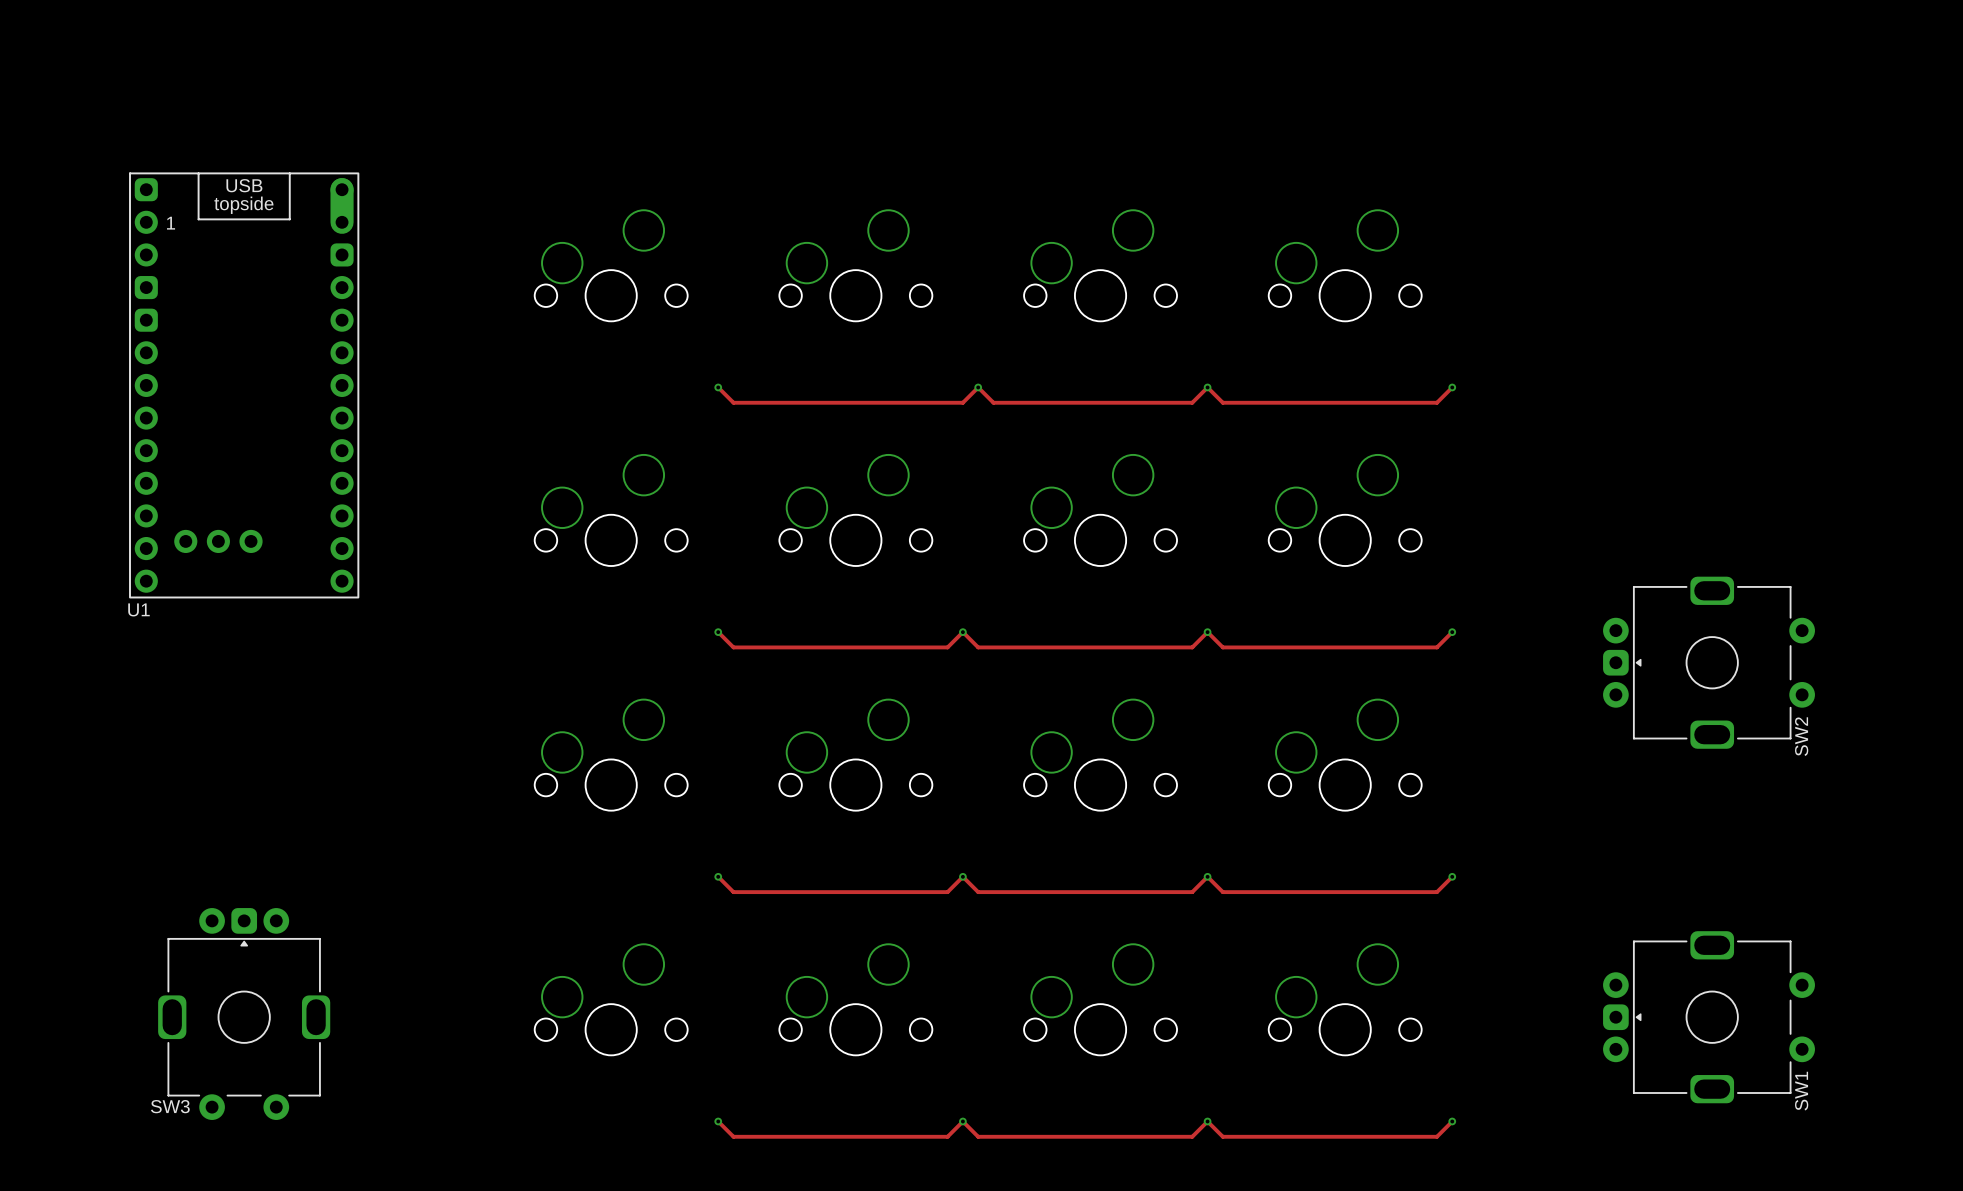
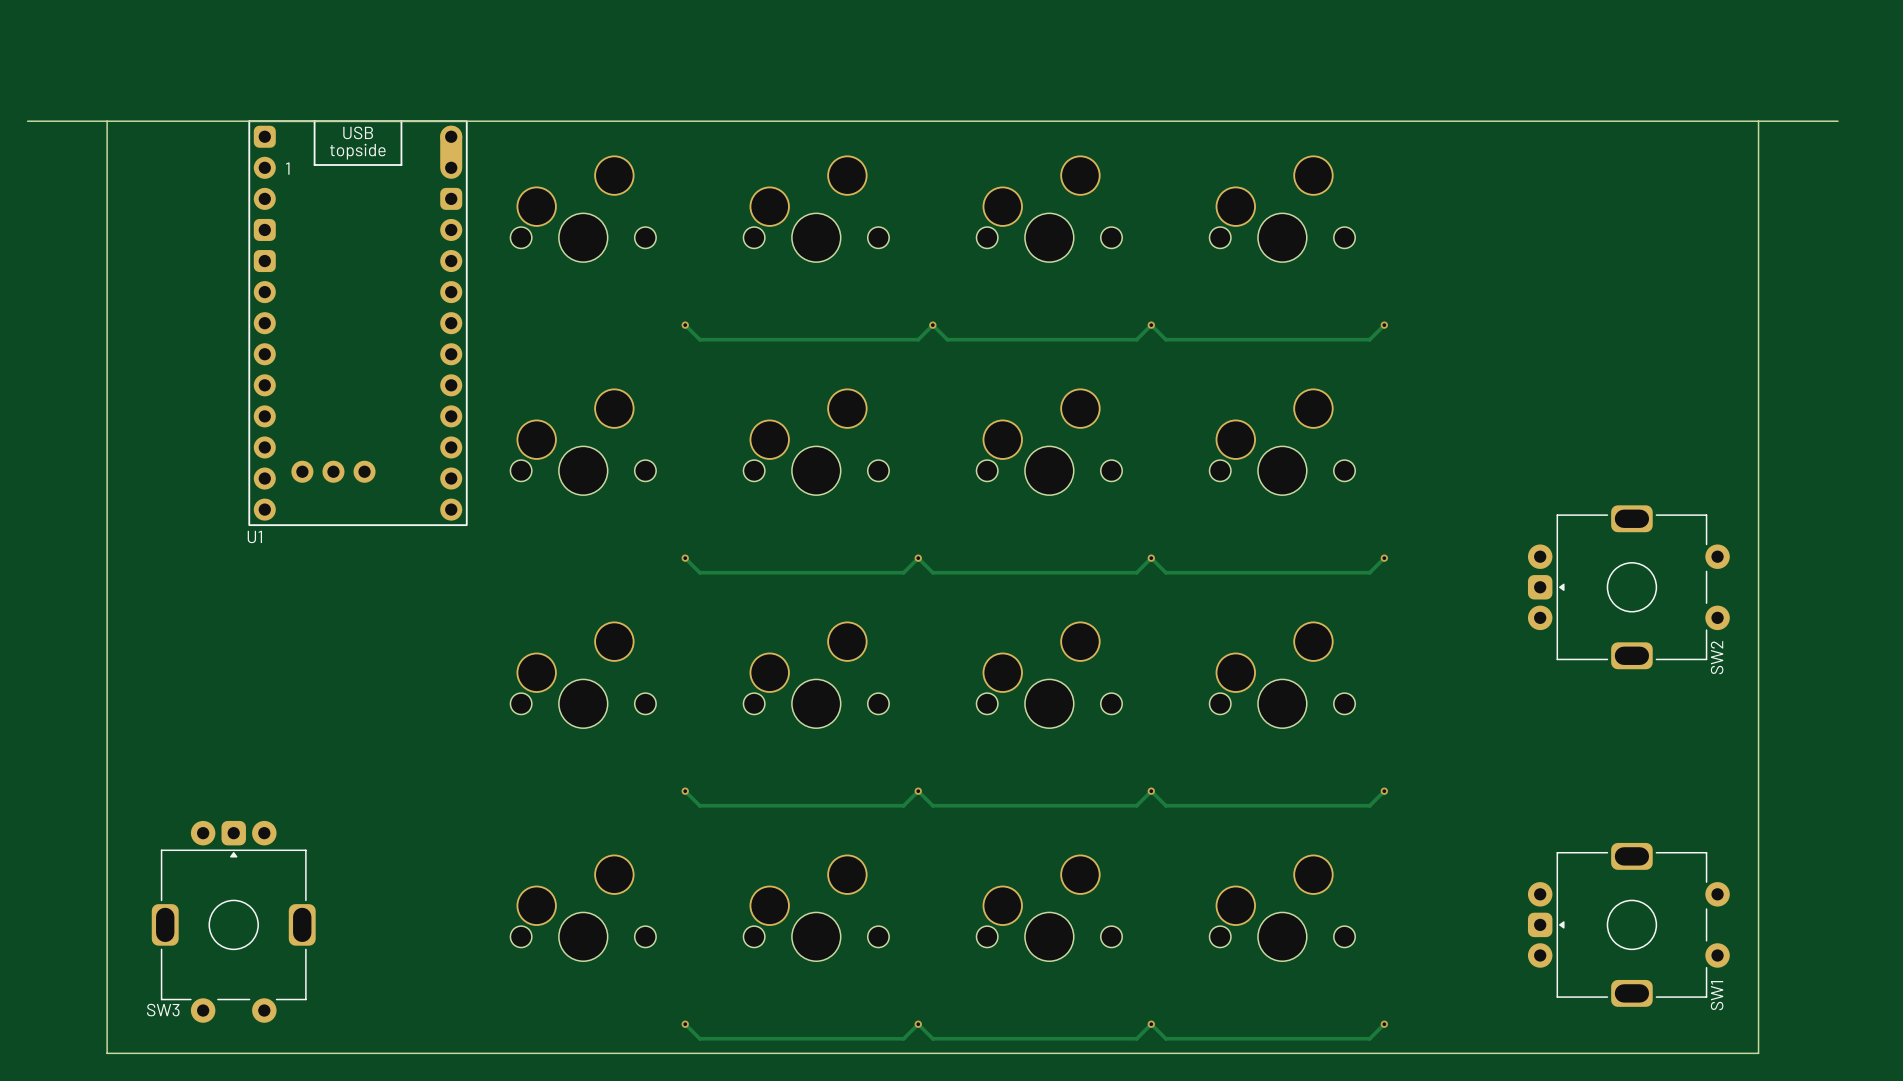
board edge: none -> (27, 121) (1838, 121)
board edge: none -> (107, 121) (107, 1053) (1758, 1053) (1758, 121)
U1 position: (244, 385) -> (358, 323)

